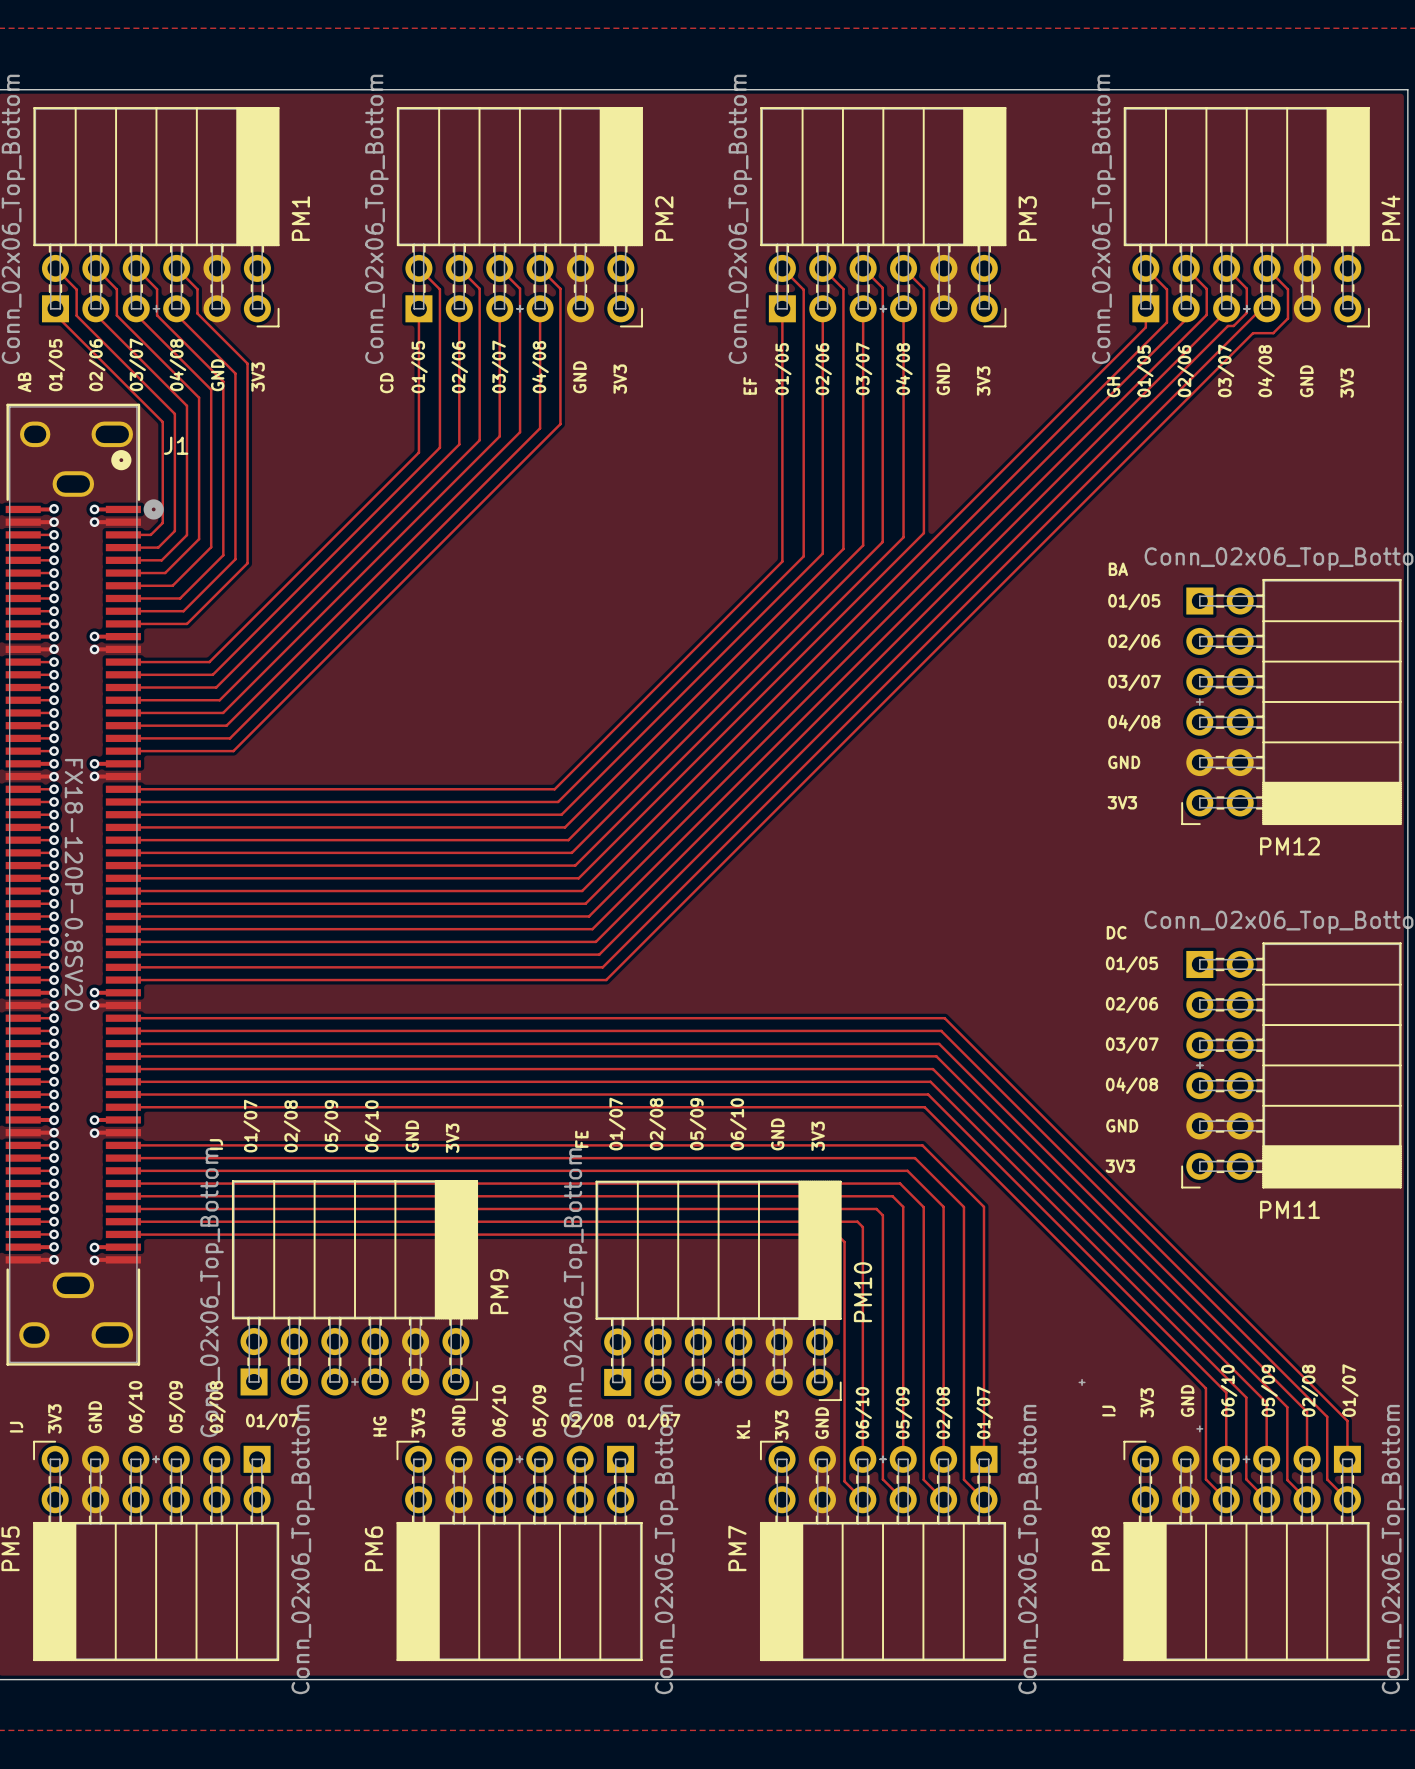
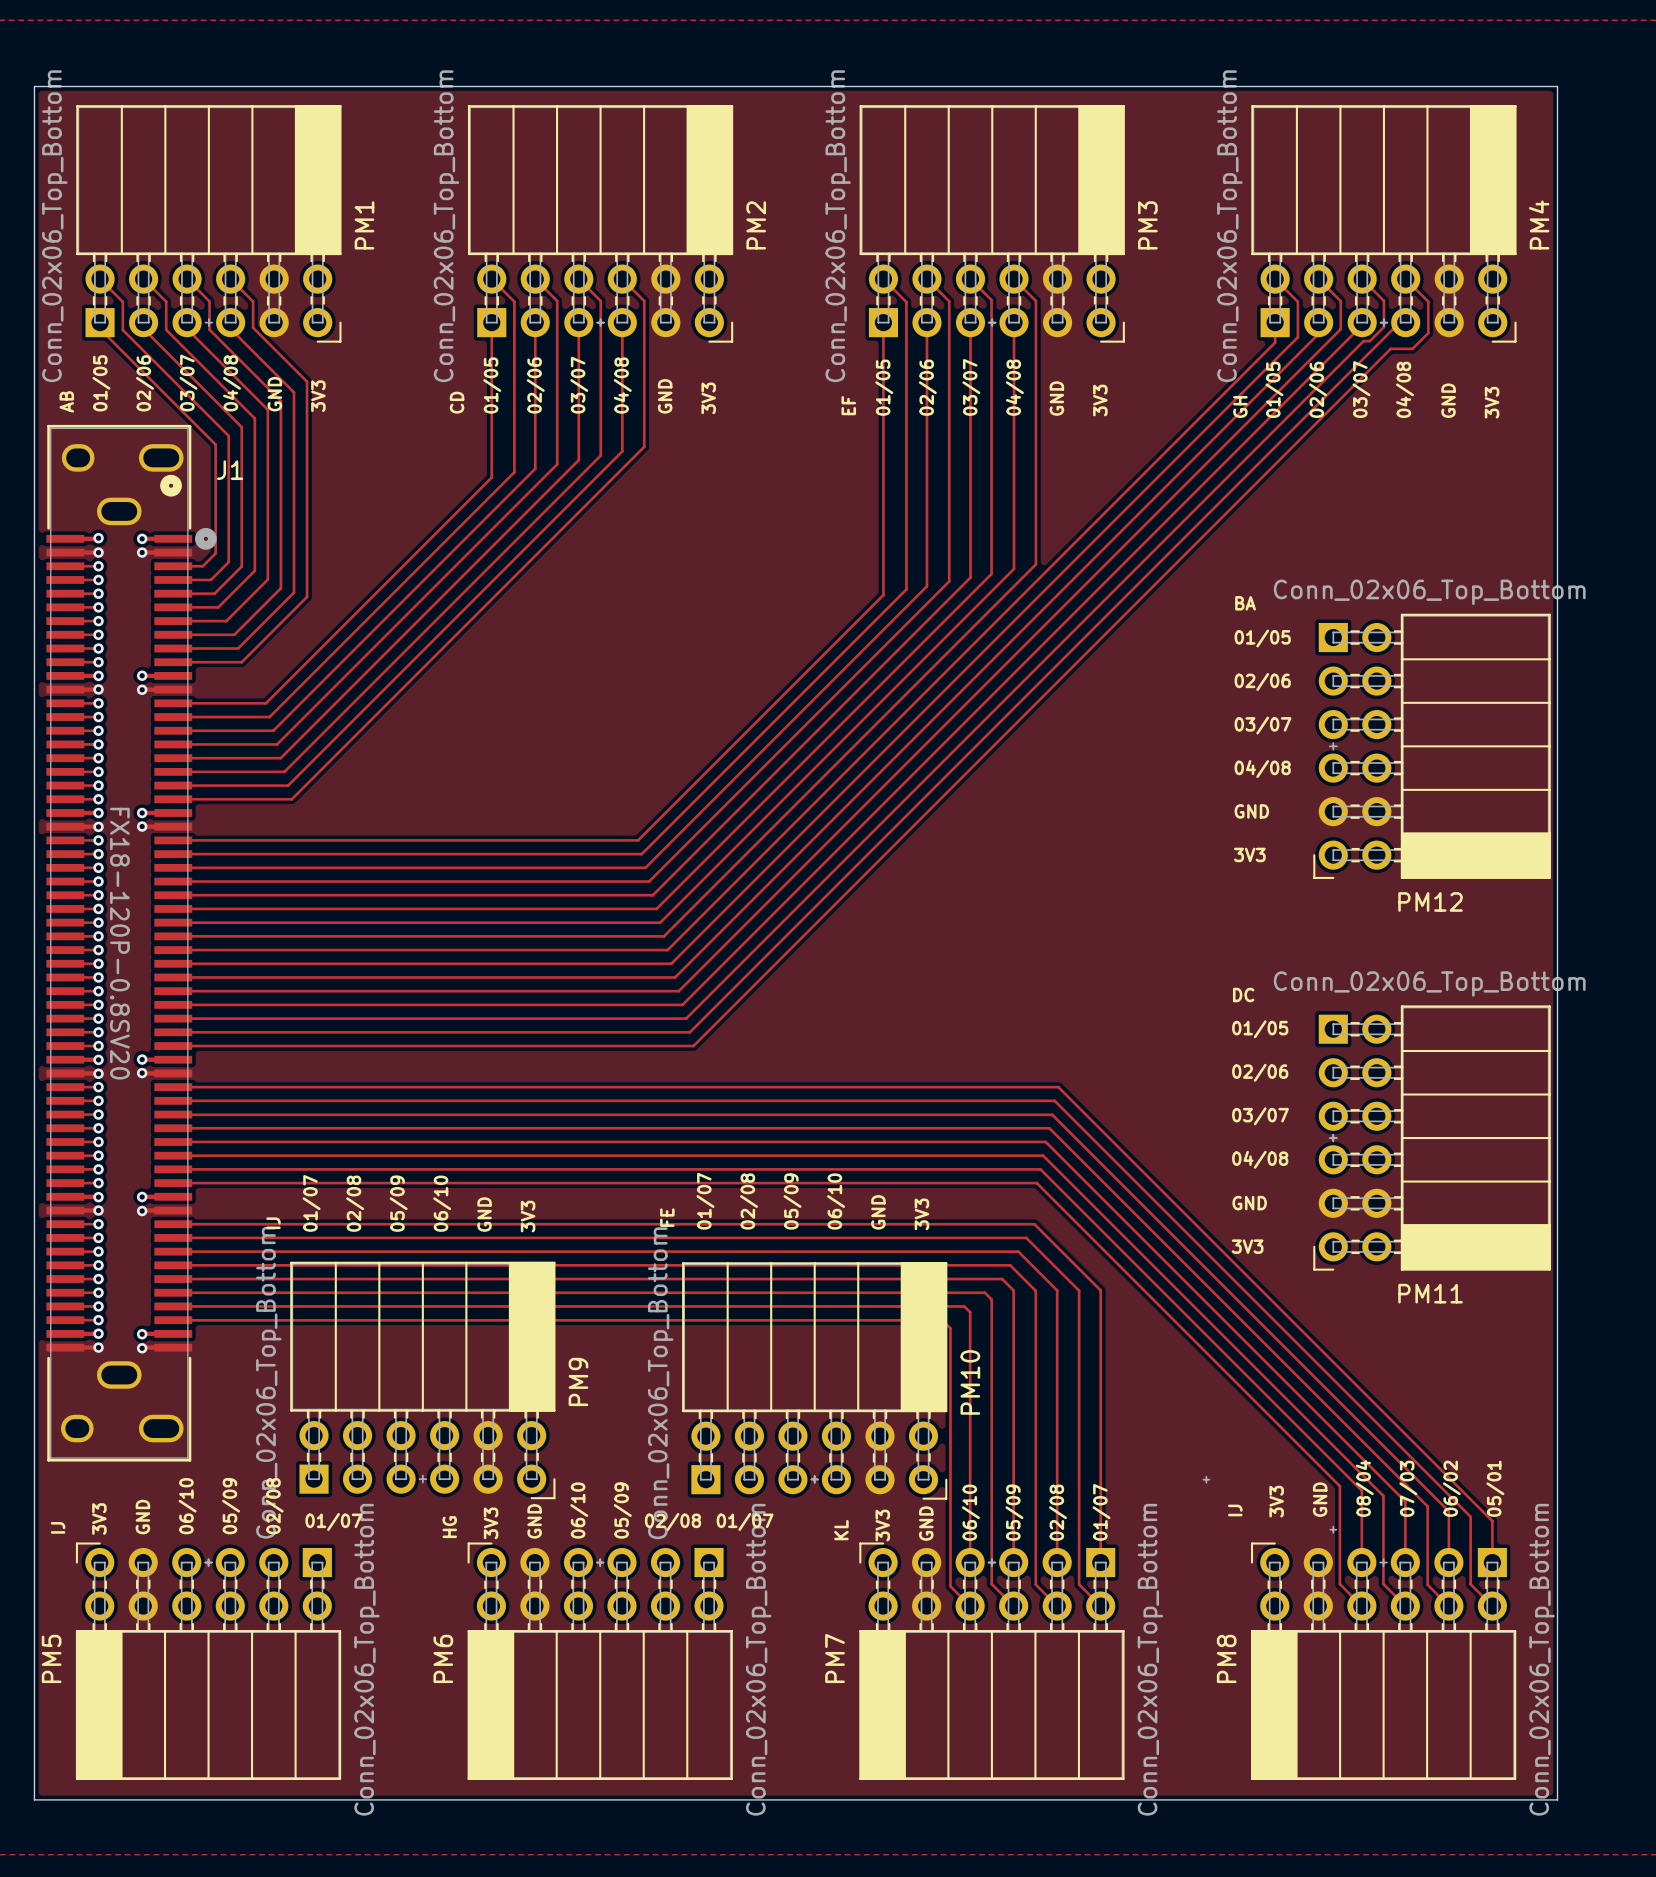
text: 06/10 (1229, 1390) -> 08/04 (1364, 1488)
text: 05/09 (1269, 1390) -> 07/03 (1408, 1488)
text: 02/08 (1309, 1390) -> 06/02 (1451, 1488)
text: 01/07 (1350, 1390) -> 05/01 (1495, 1488)

